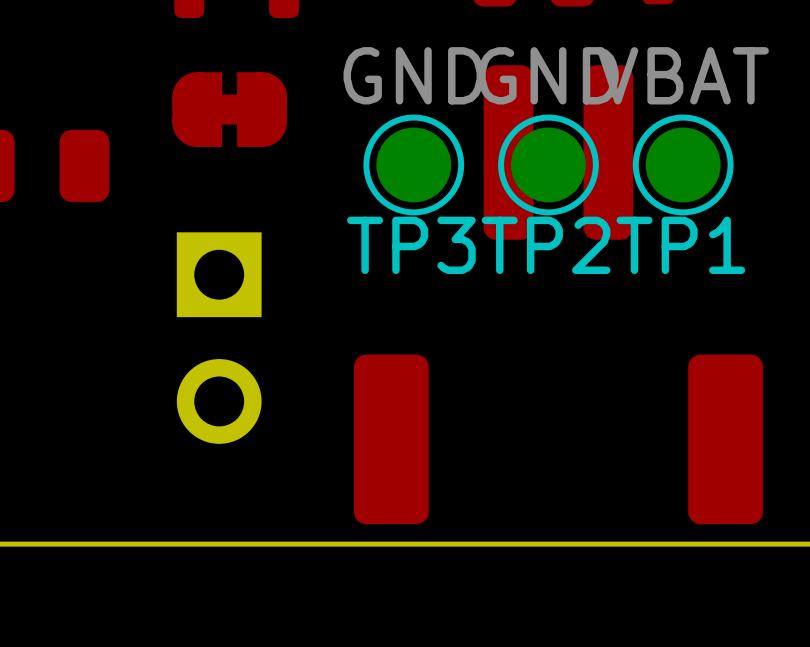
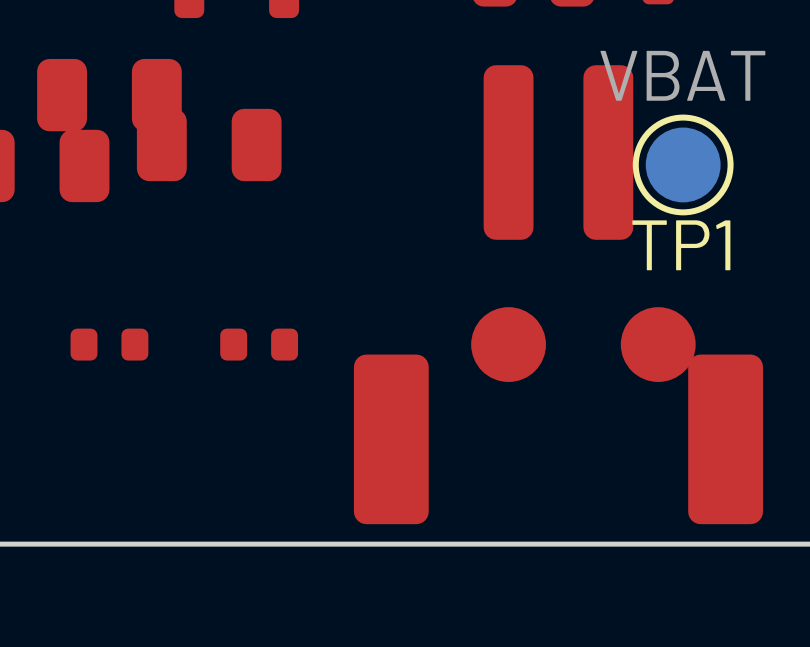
part footprint: [172, 72, 288, 148] -> [136, 108, 282, 182]
part: none -> (109, 95)
TP3 side: bottom (413, 164) -> top (508, 344)
TP2 side: bottom (548, 164) -> top (658, 344)
part footprint: [176, 232, 262, 444] -> [220, 328, 299, 361]
part: none -> (109, 344)

